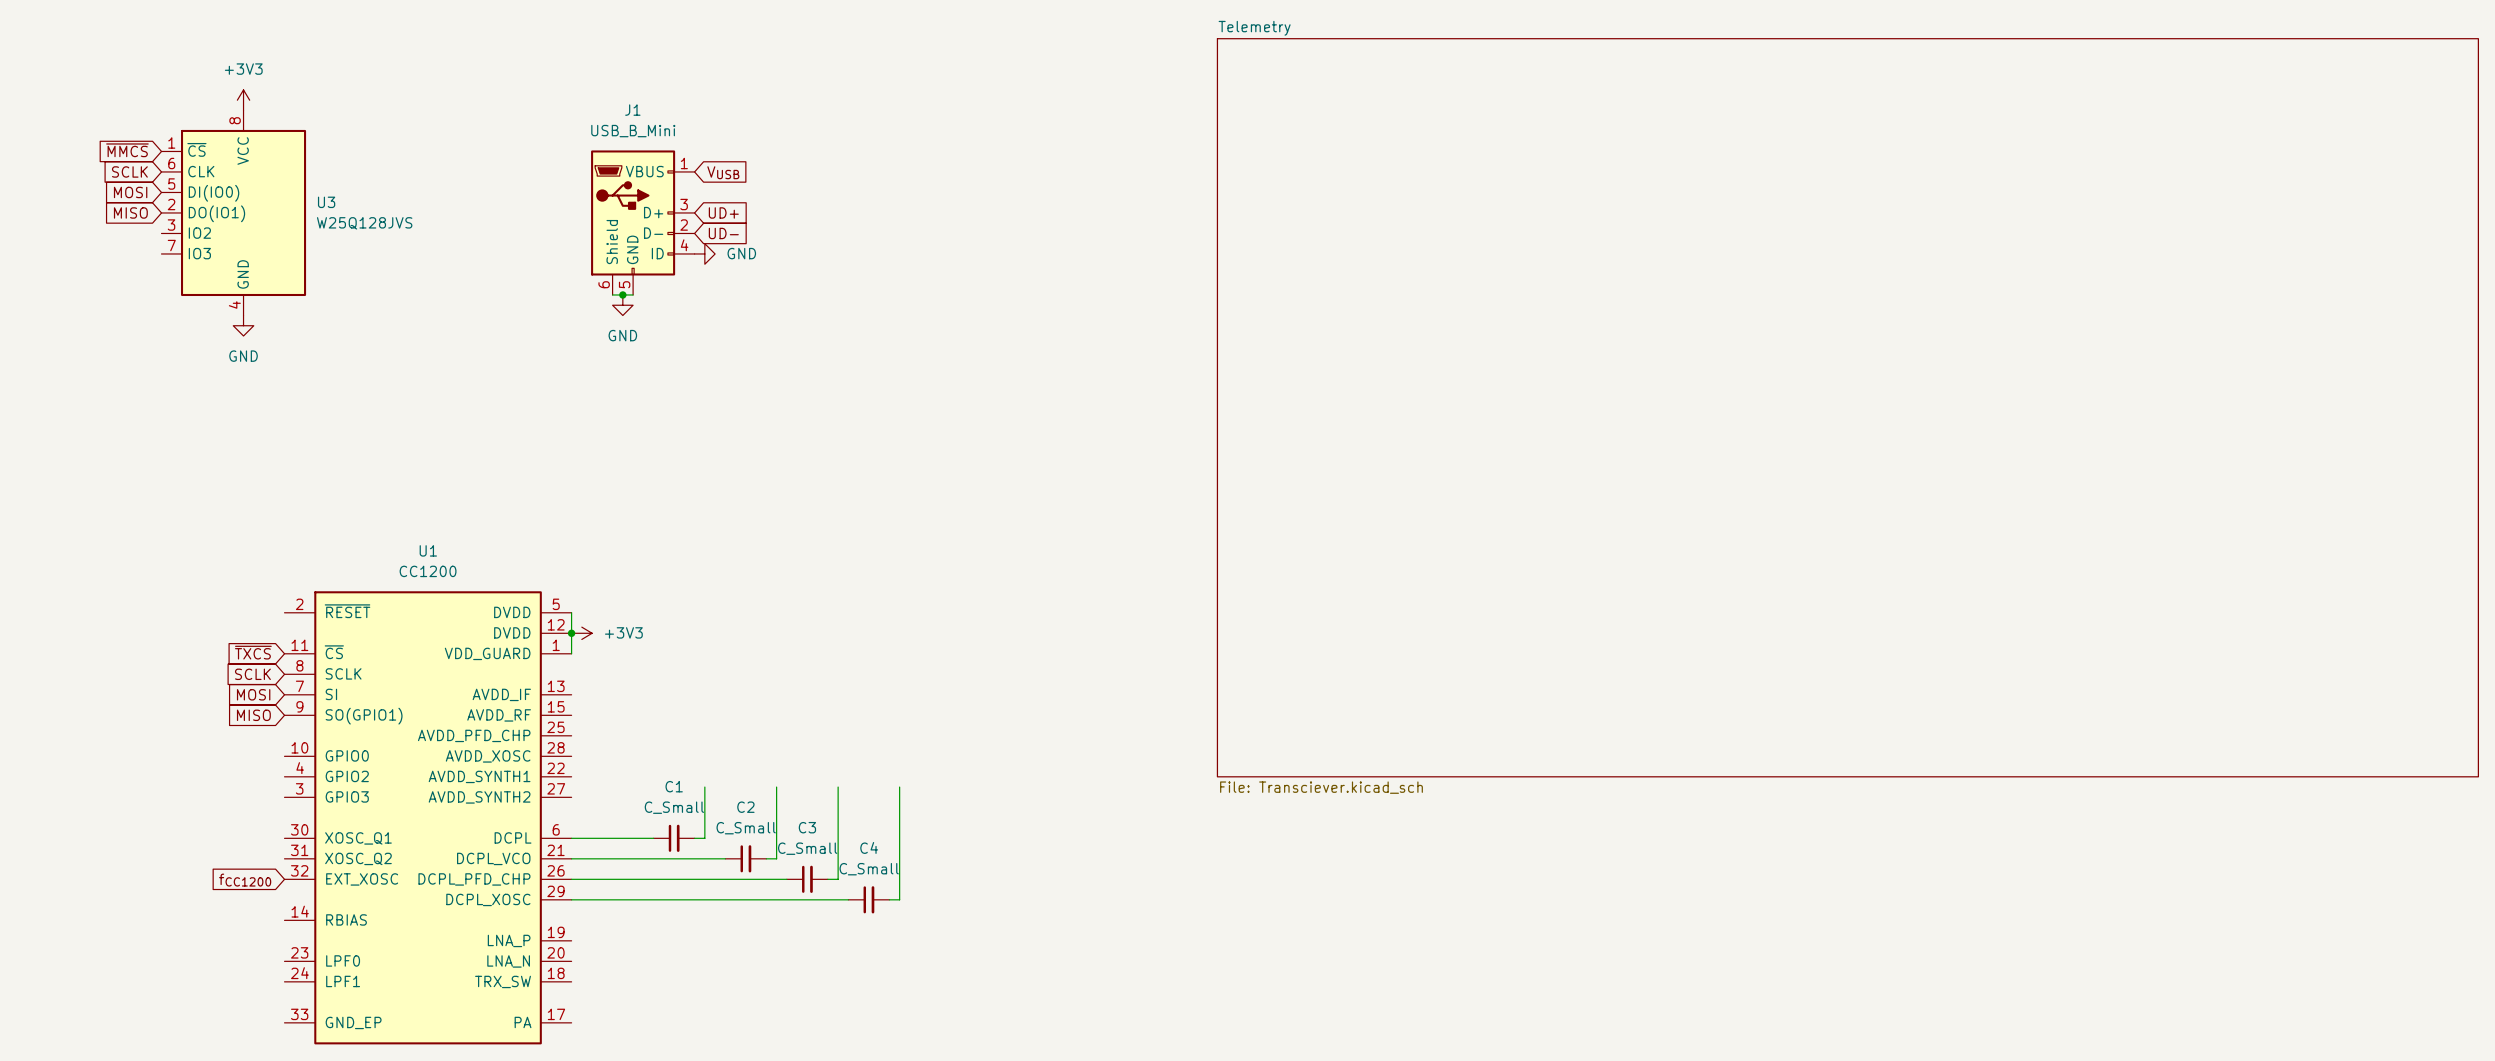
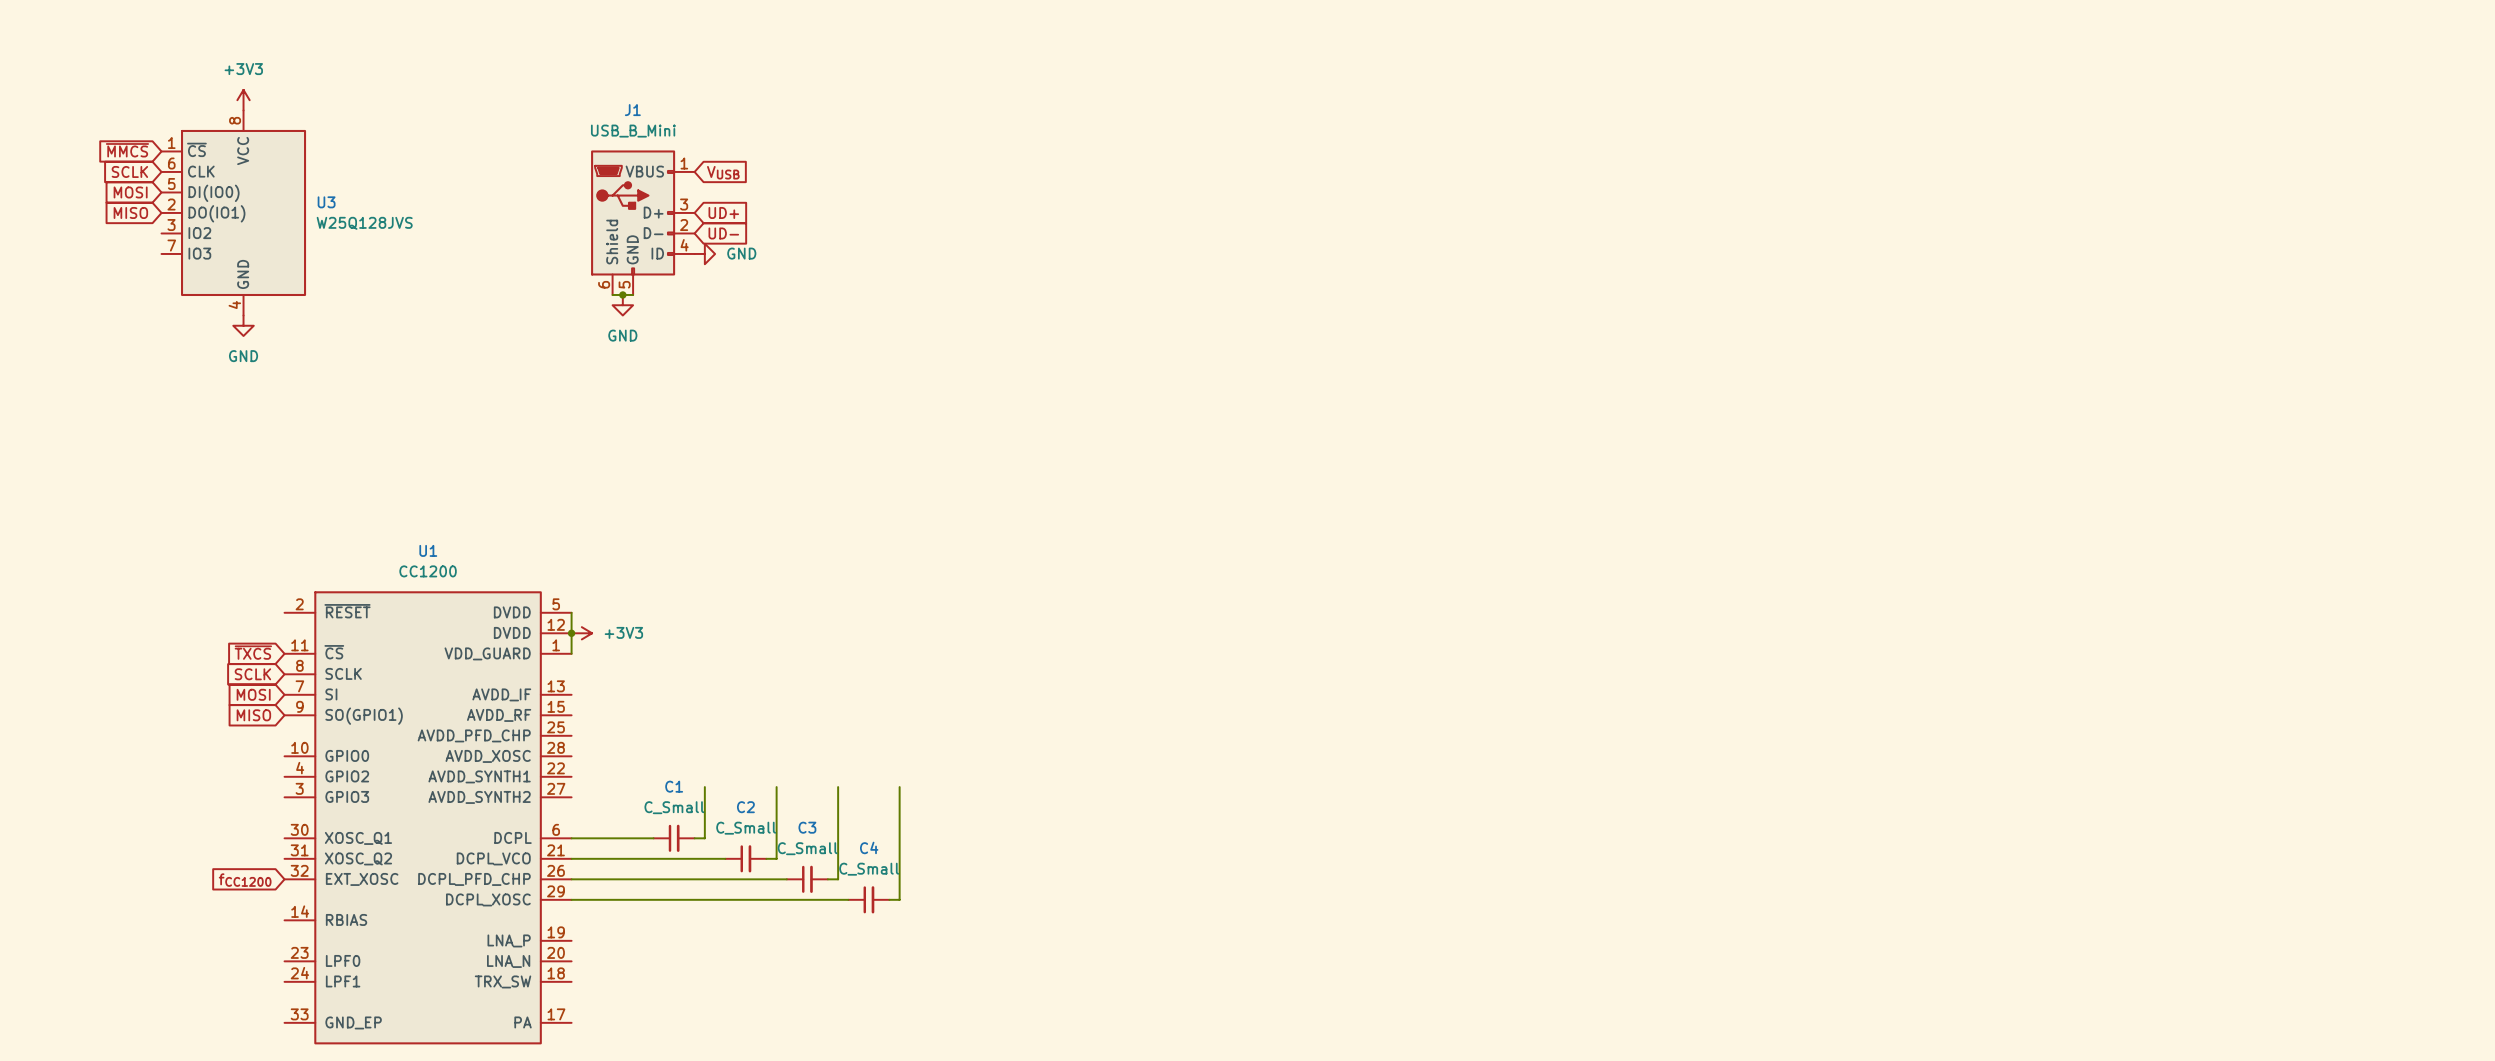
sheet Telemetry: File: Transciever.kicad_sch (1847, 407) -> none

